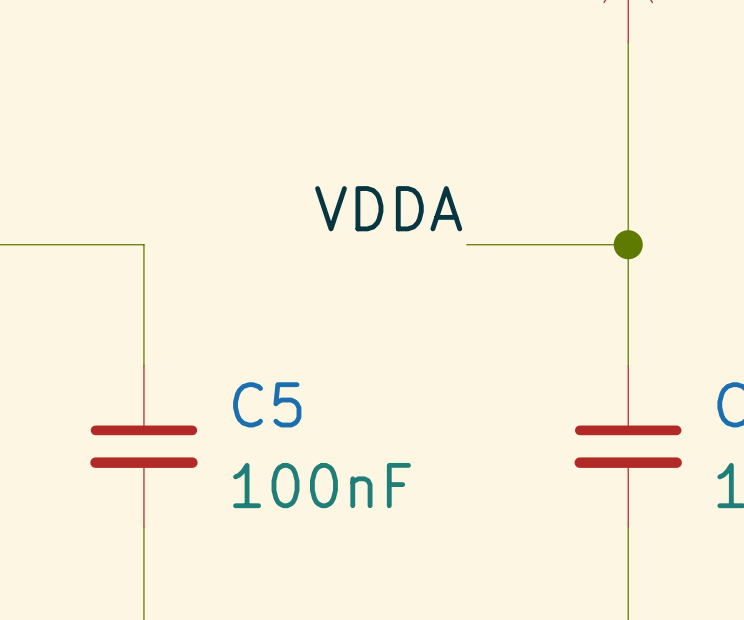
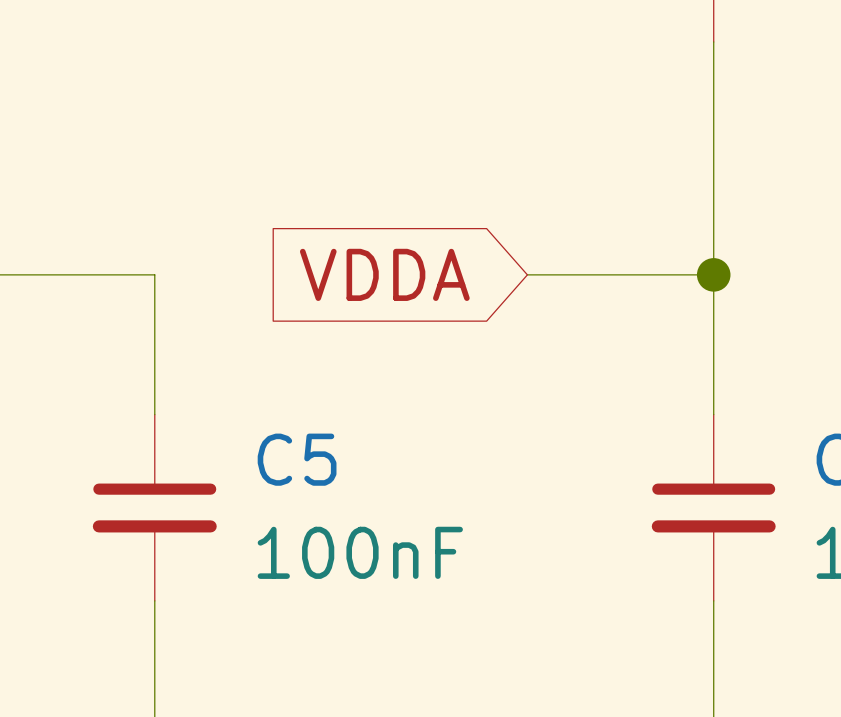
label: VDDA (388, 208) -> none
global label: none -> VDDA (384, 274)

